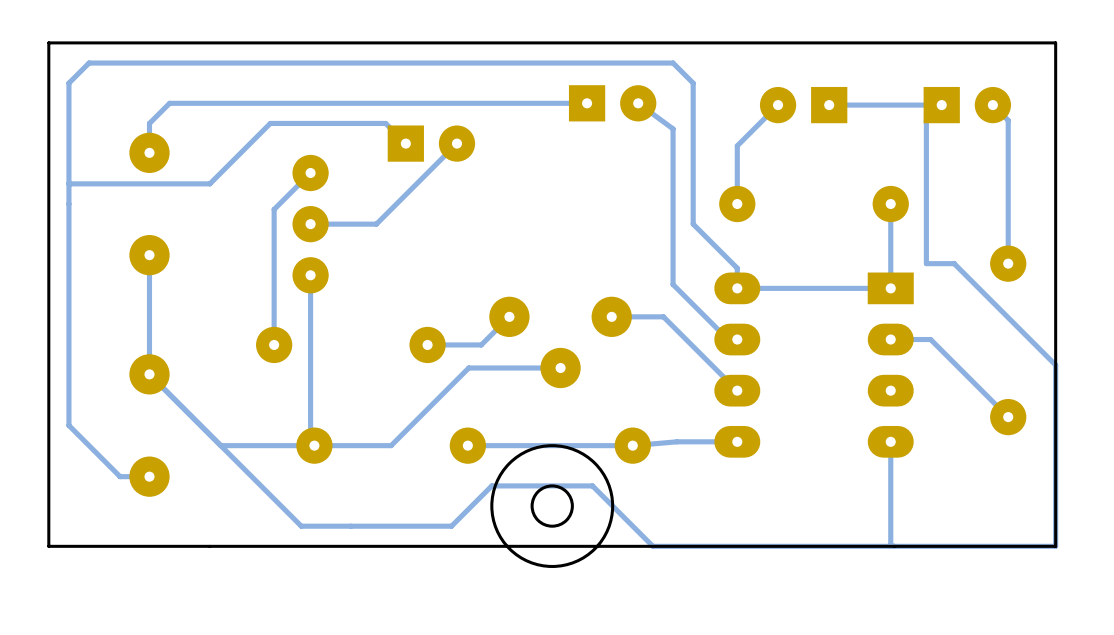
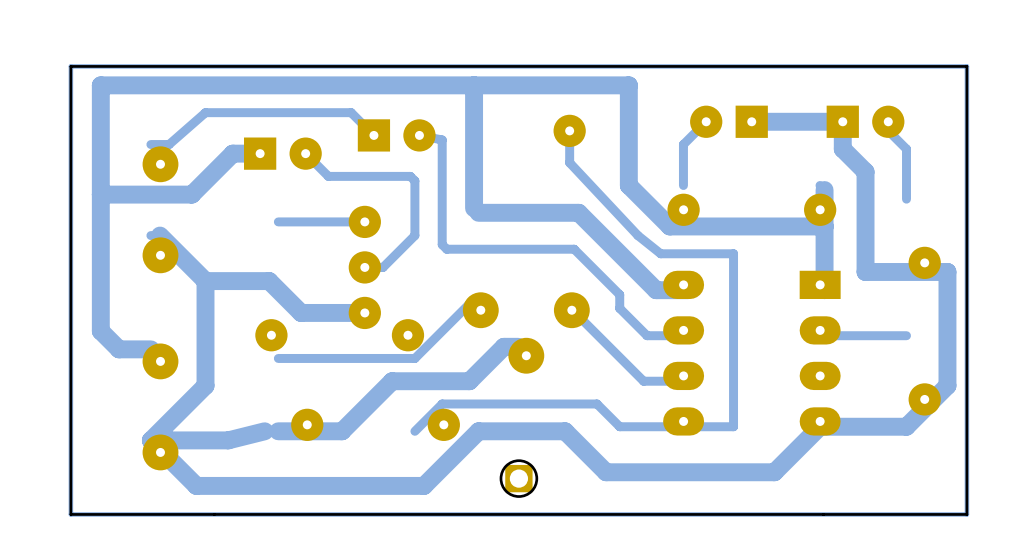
bottom track: none -> (474, 85) (474, 208) (478, 212) (578, 212) (656, 290) (688, 290)
part footprint: [568, 85, 657, 122] -> [553, 114, 586, 148]
bottom track: (587, 103) (169, 103) (149, 123) (149, 152) -> none
bottom track: (638, 103) (673, 128) (673, 284) (728, 339) (737, 339) -> none
bottom track: none -> (706, 121) (683, 144) (683, 185)
bottom track: (778, 105) (737, 145) (737, 204) -> none
part position: (803, 105) -> (728, 121)
bottom track: (916, 105) (941, 105) (926, 120) (926, 263) (954, 263) (1055, 365) -> (608, 514) (70, 514) (70, 66) (966, 66) (966, 353)
bottom track: none -> (842, 121) (842, 149) (865, 171) (865, 271) (947, 271) (947, 385) (906, 426) (820, 426) (774, 472) (606, 472) (565, 431) (478, 431) (424, 485) (196, 485) (150, 440)
bottom track width: thin (916, 105) (829, 105) -> thick (842, 121) (765, 121)
bottom track: none -> (888, 121) (888, 130) (906, 149) (906, 199)
part position: (967, 105) -> (865, 121)
bottom track: (992, 105) (1008, 120) (1008, 263) -> none
bottom track: none -> (569, 130) (569, 162) (637, 235) (660, 253) (733, 253) (733, 426) (619, 426) (596, 403) (442, 403) (414, 431)
bottom track: none -> (419, 135) (442, 139) (442, 244) (446, 249) (574, 249) (619, 294) (619, 308) (647, 335) (688, 335)
bottom track: none -> (378, 139) (351, 112) (205, 112) (169, 144) (150, 144)
bottom track: none -> (260, 153) (232, 153) (191, 194) (100, 194)
part: none -> (282, 153)
bottom track: none -> (305, 153) (328, 176) (410, 176) (414, 180) (414, 235) (383, 267) (364, 267)
bottom track: (405, 143) (385, 123) (270, 123) (209, 183) (68, 183) -> none
part position: (431, 143) -> (396, 135)
bottom track: (456, 143) (376, 224) (310, 224) -> none
bottom track: (310, 172) (274, 209) (274, 344) -> none
bottom track: none -> (820, 185) (824, 190) (824, 290)
bottom track: (890, 204) (890, 288) (737, 288) (737, 268) (693, 224) (693, 83) (673, 63) (89, 63) (68, 83) (68, 425) (120, 476) (149, 476) -> none
bottom track: none -> (364, 221) (278, 221)
bottom track: none -> (824, 226) (669, 226) (628, 185) (628, 85) (100, 85) (100, 331) (119, 349) (150, 349)
part position: (310, 224) -> (364, 267)
bottom track: none -> (150, 235) (159, 235) (205, 281)
bottom track: (149, 255) (149, 374) (301, 526) (451, 526) (491, 485) (592, 485) (652, 546) -> none
bottom track: (310, 275) (310, 441) (314, 445) -> none
bottom track: none -> (205, 281) (269, 281) (301, 312) (364, 312)
bottom track: none -> (205, 281) (205, 385) (150, 440)
bottom track: none -> (472, 301) (414, 358) (278, 358)
bottom track: none -> (563, 301) (643, 381) (688, 381)
bottom track: (509, 316) (481, 344) (427, 344) -> none
bottom track: (611, 316) (663, 316) (737, 390) -> none
bottom track: (890, 339) (930, 339) (1008, 417) -> none
bottom track: none -> (906, 335) (824, 335)
bottom track: none -> (518, 346) (503, 346) (469, 381) (392, 381) (342, 431) (264, 431) (228, 440) (150, 440)
bottom track: (560, 368) (468, 368) (391, 445) (220, 445) -> none
bottom track: (737, 441) (676, 441) (632, 445) (467, 445) -> none
bottom track: (890, 441) (890, 546) -> none
round board edge: [490, 444, 615, 568] -> none
part: (632, 445) -> none
part: none -> (518, 478)

